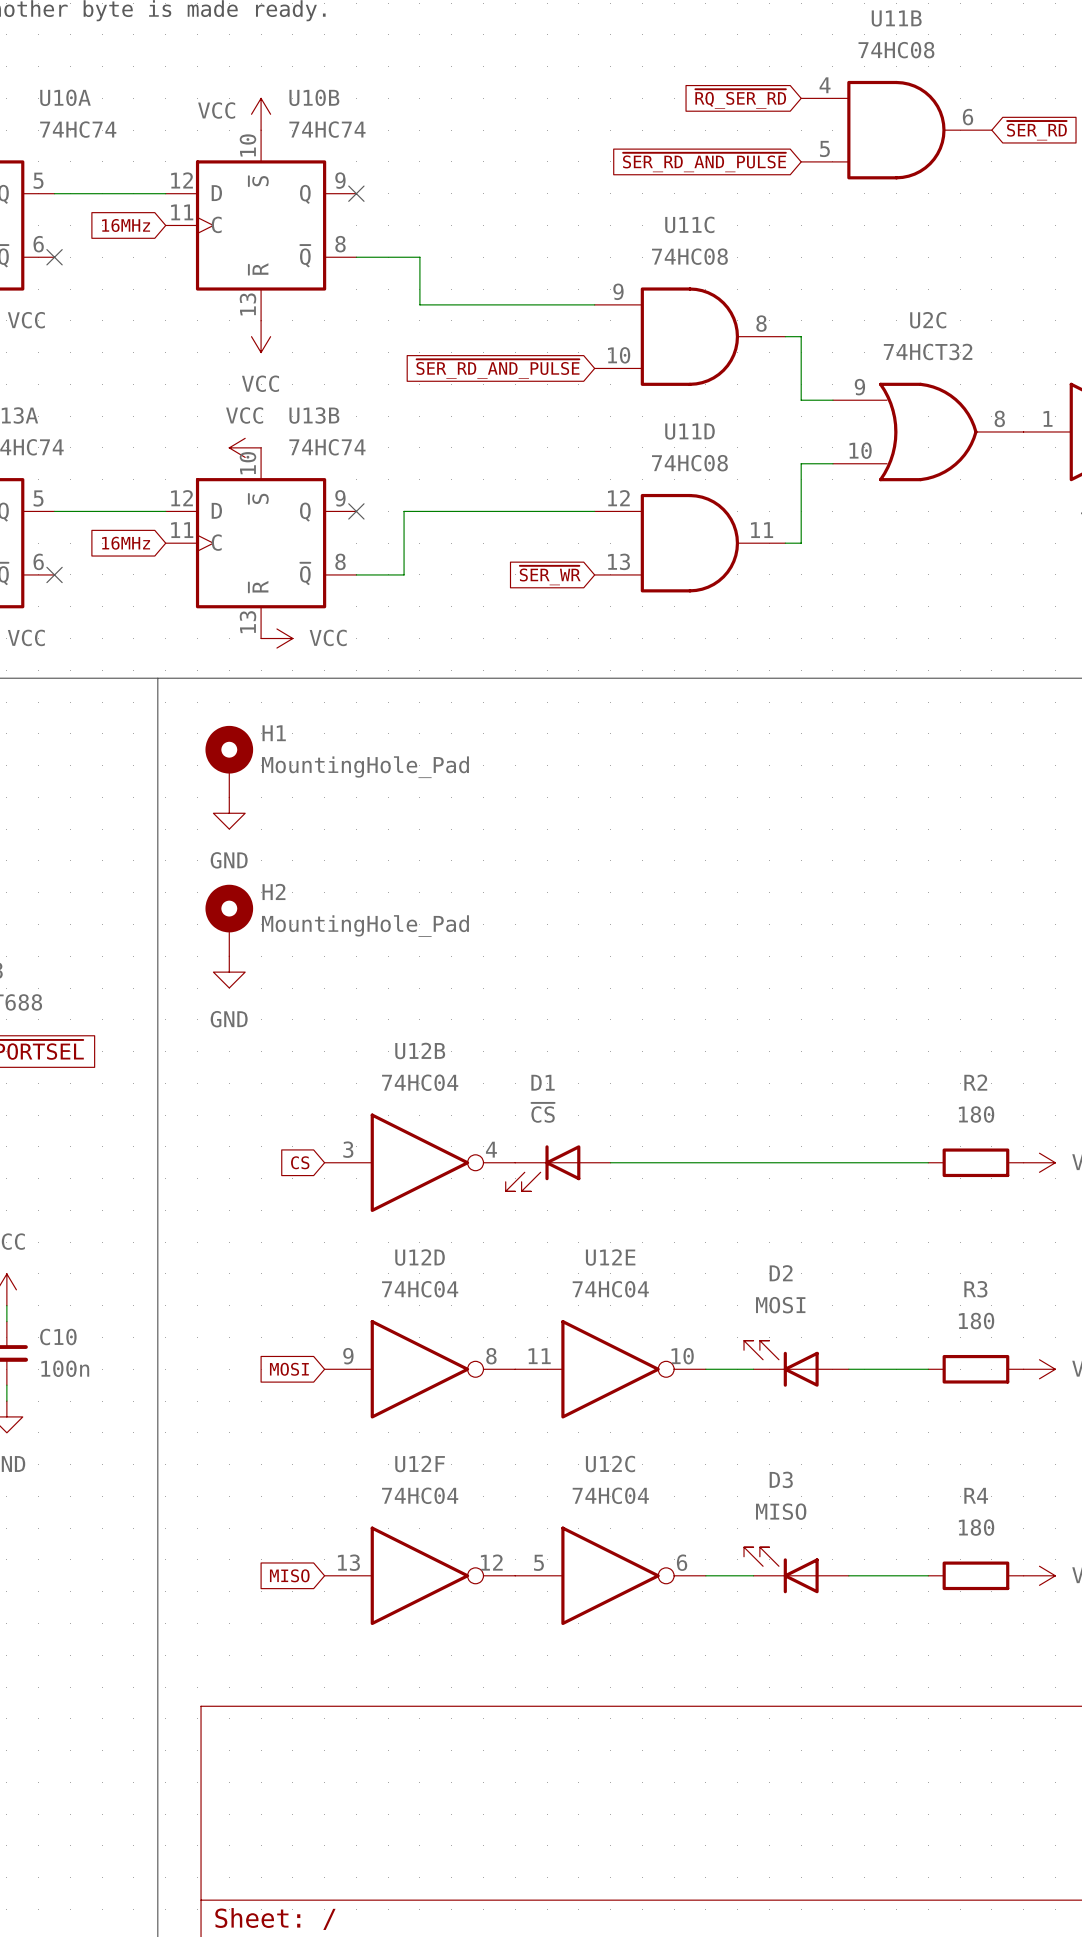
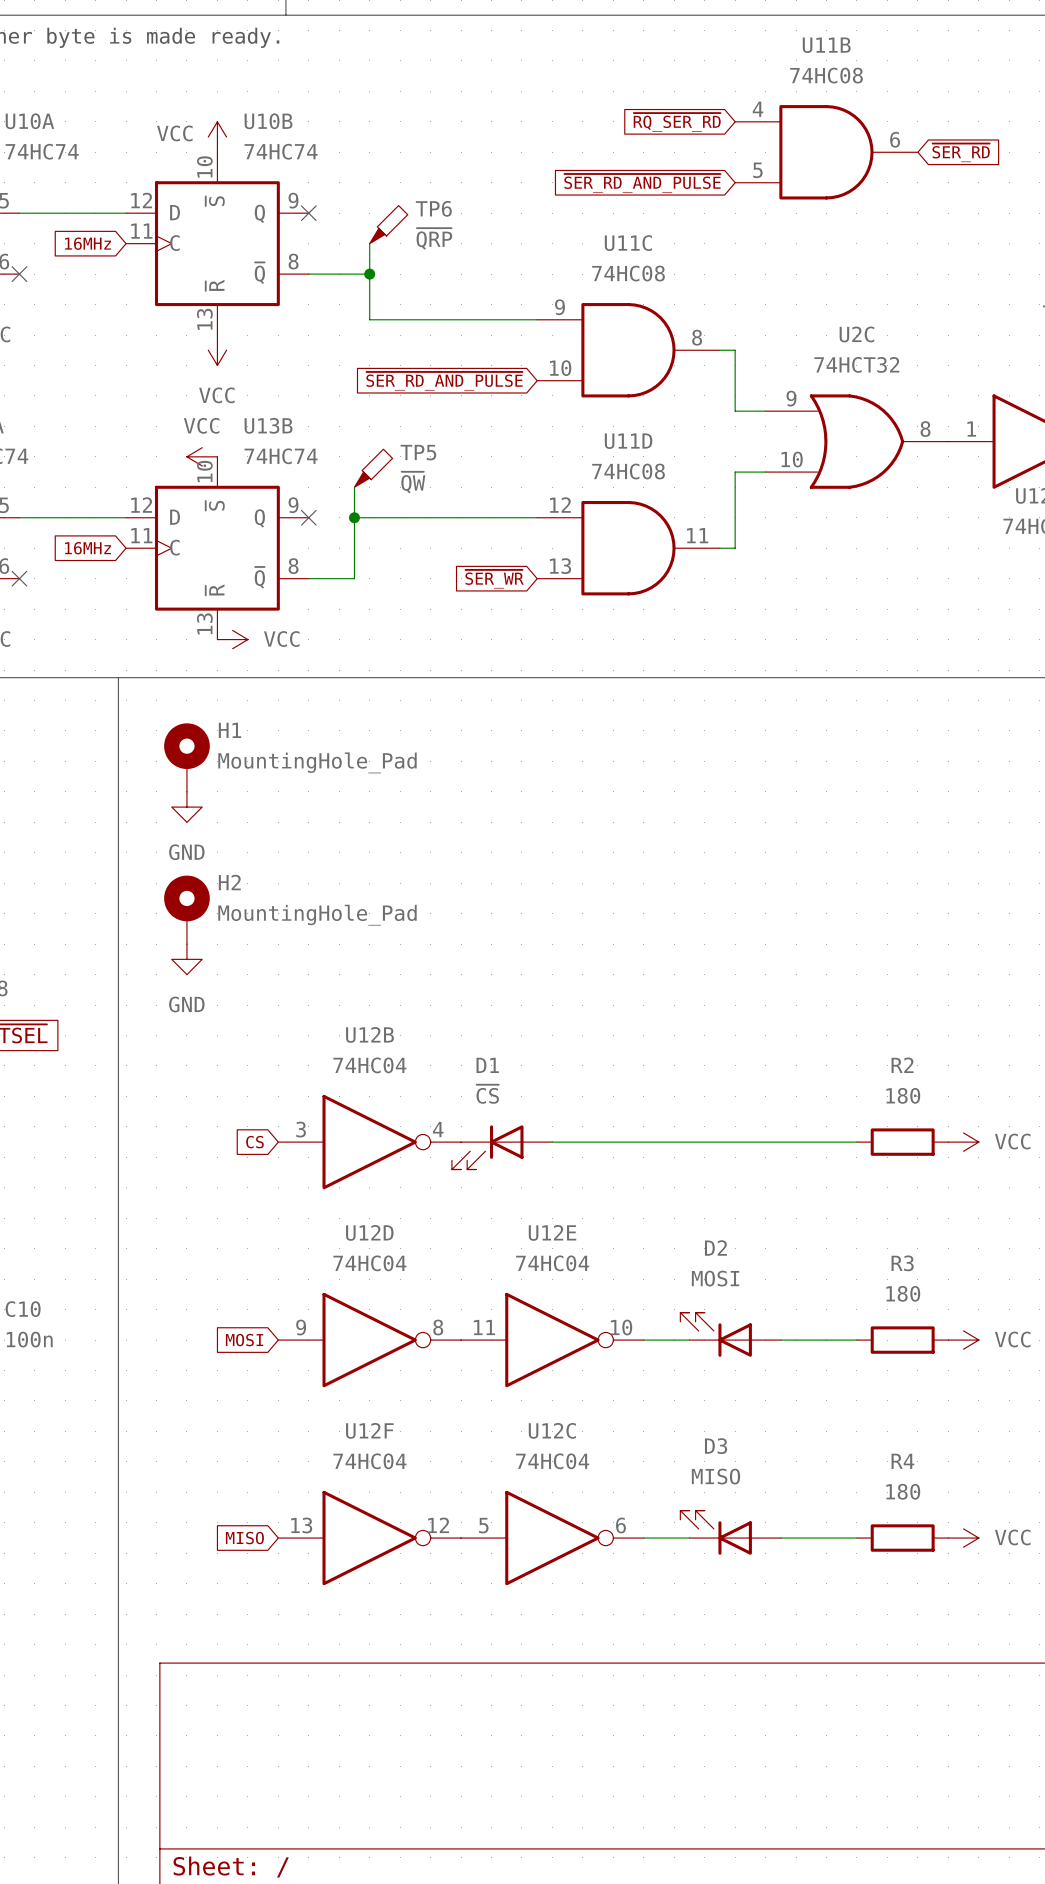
TP6: none -> ~{QRP} (388, 224)
wire: none -> (369, 243) (369, 274)
junction: none -> (369, 274)
TP5: none -> ~{QW} (373, 468)
wire: none -> (354, 487) (354, 517)
junction: none -> (354, 517)

